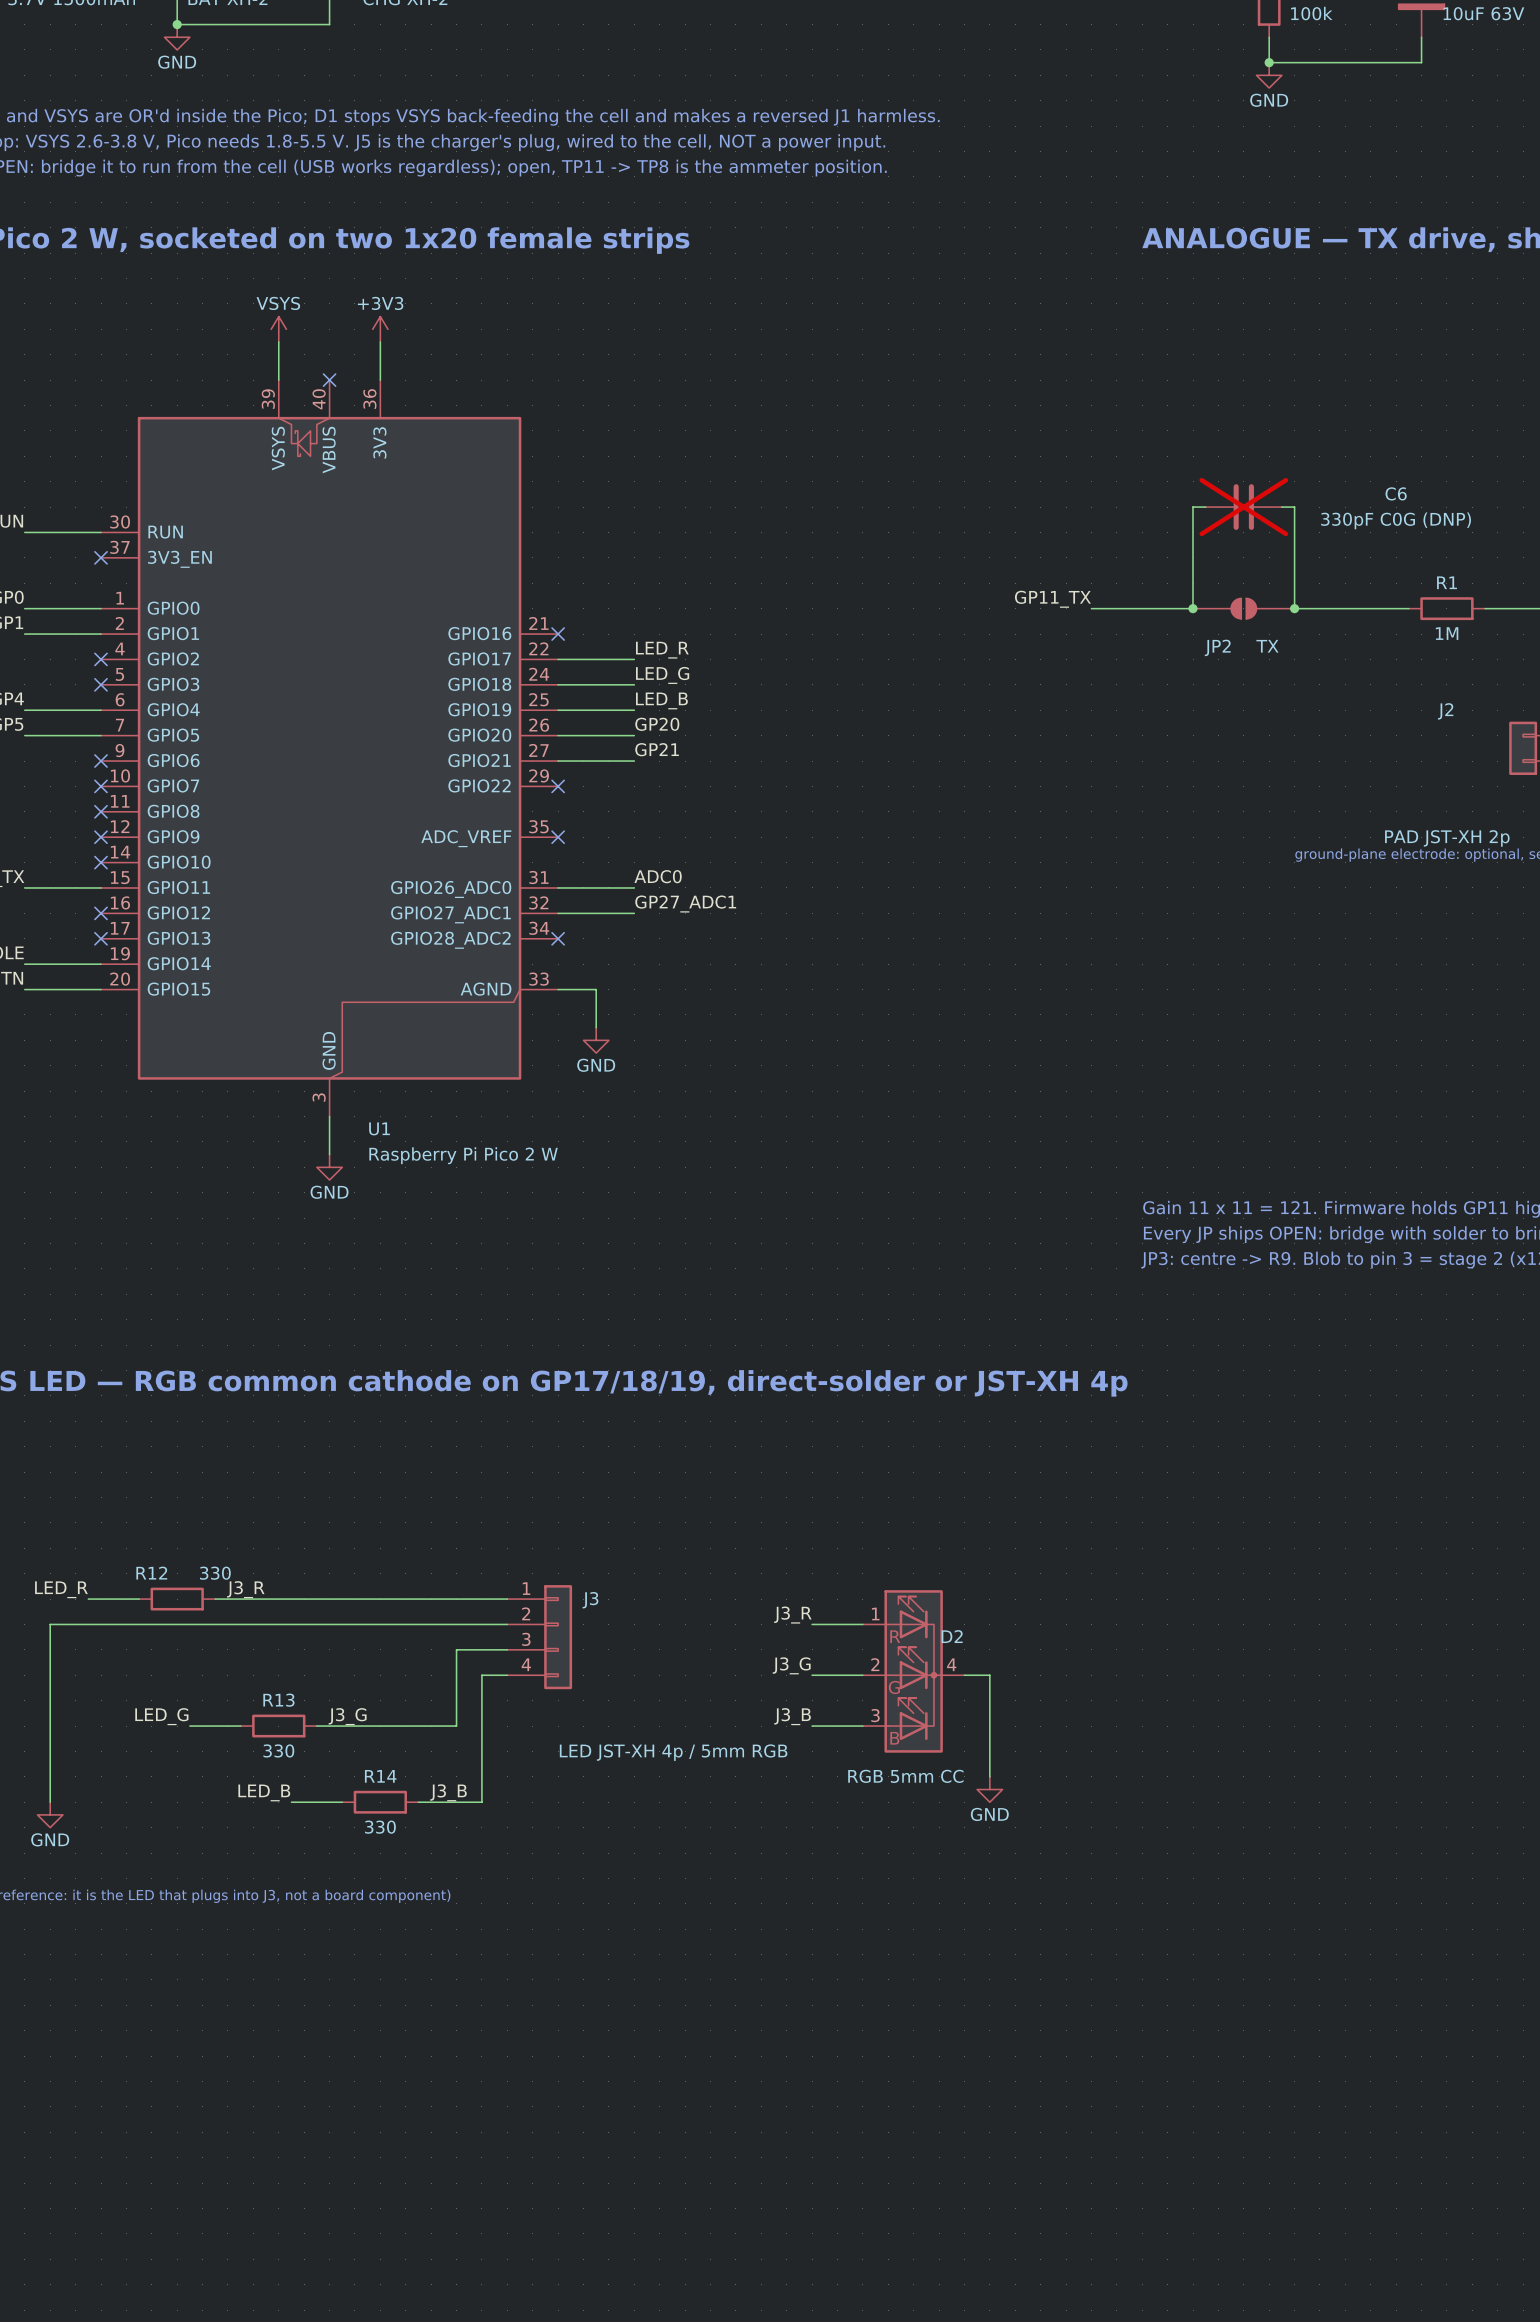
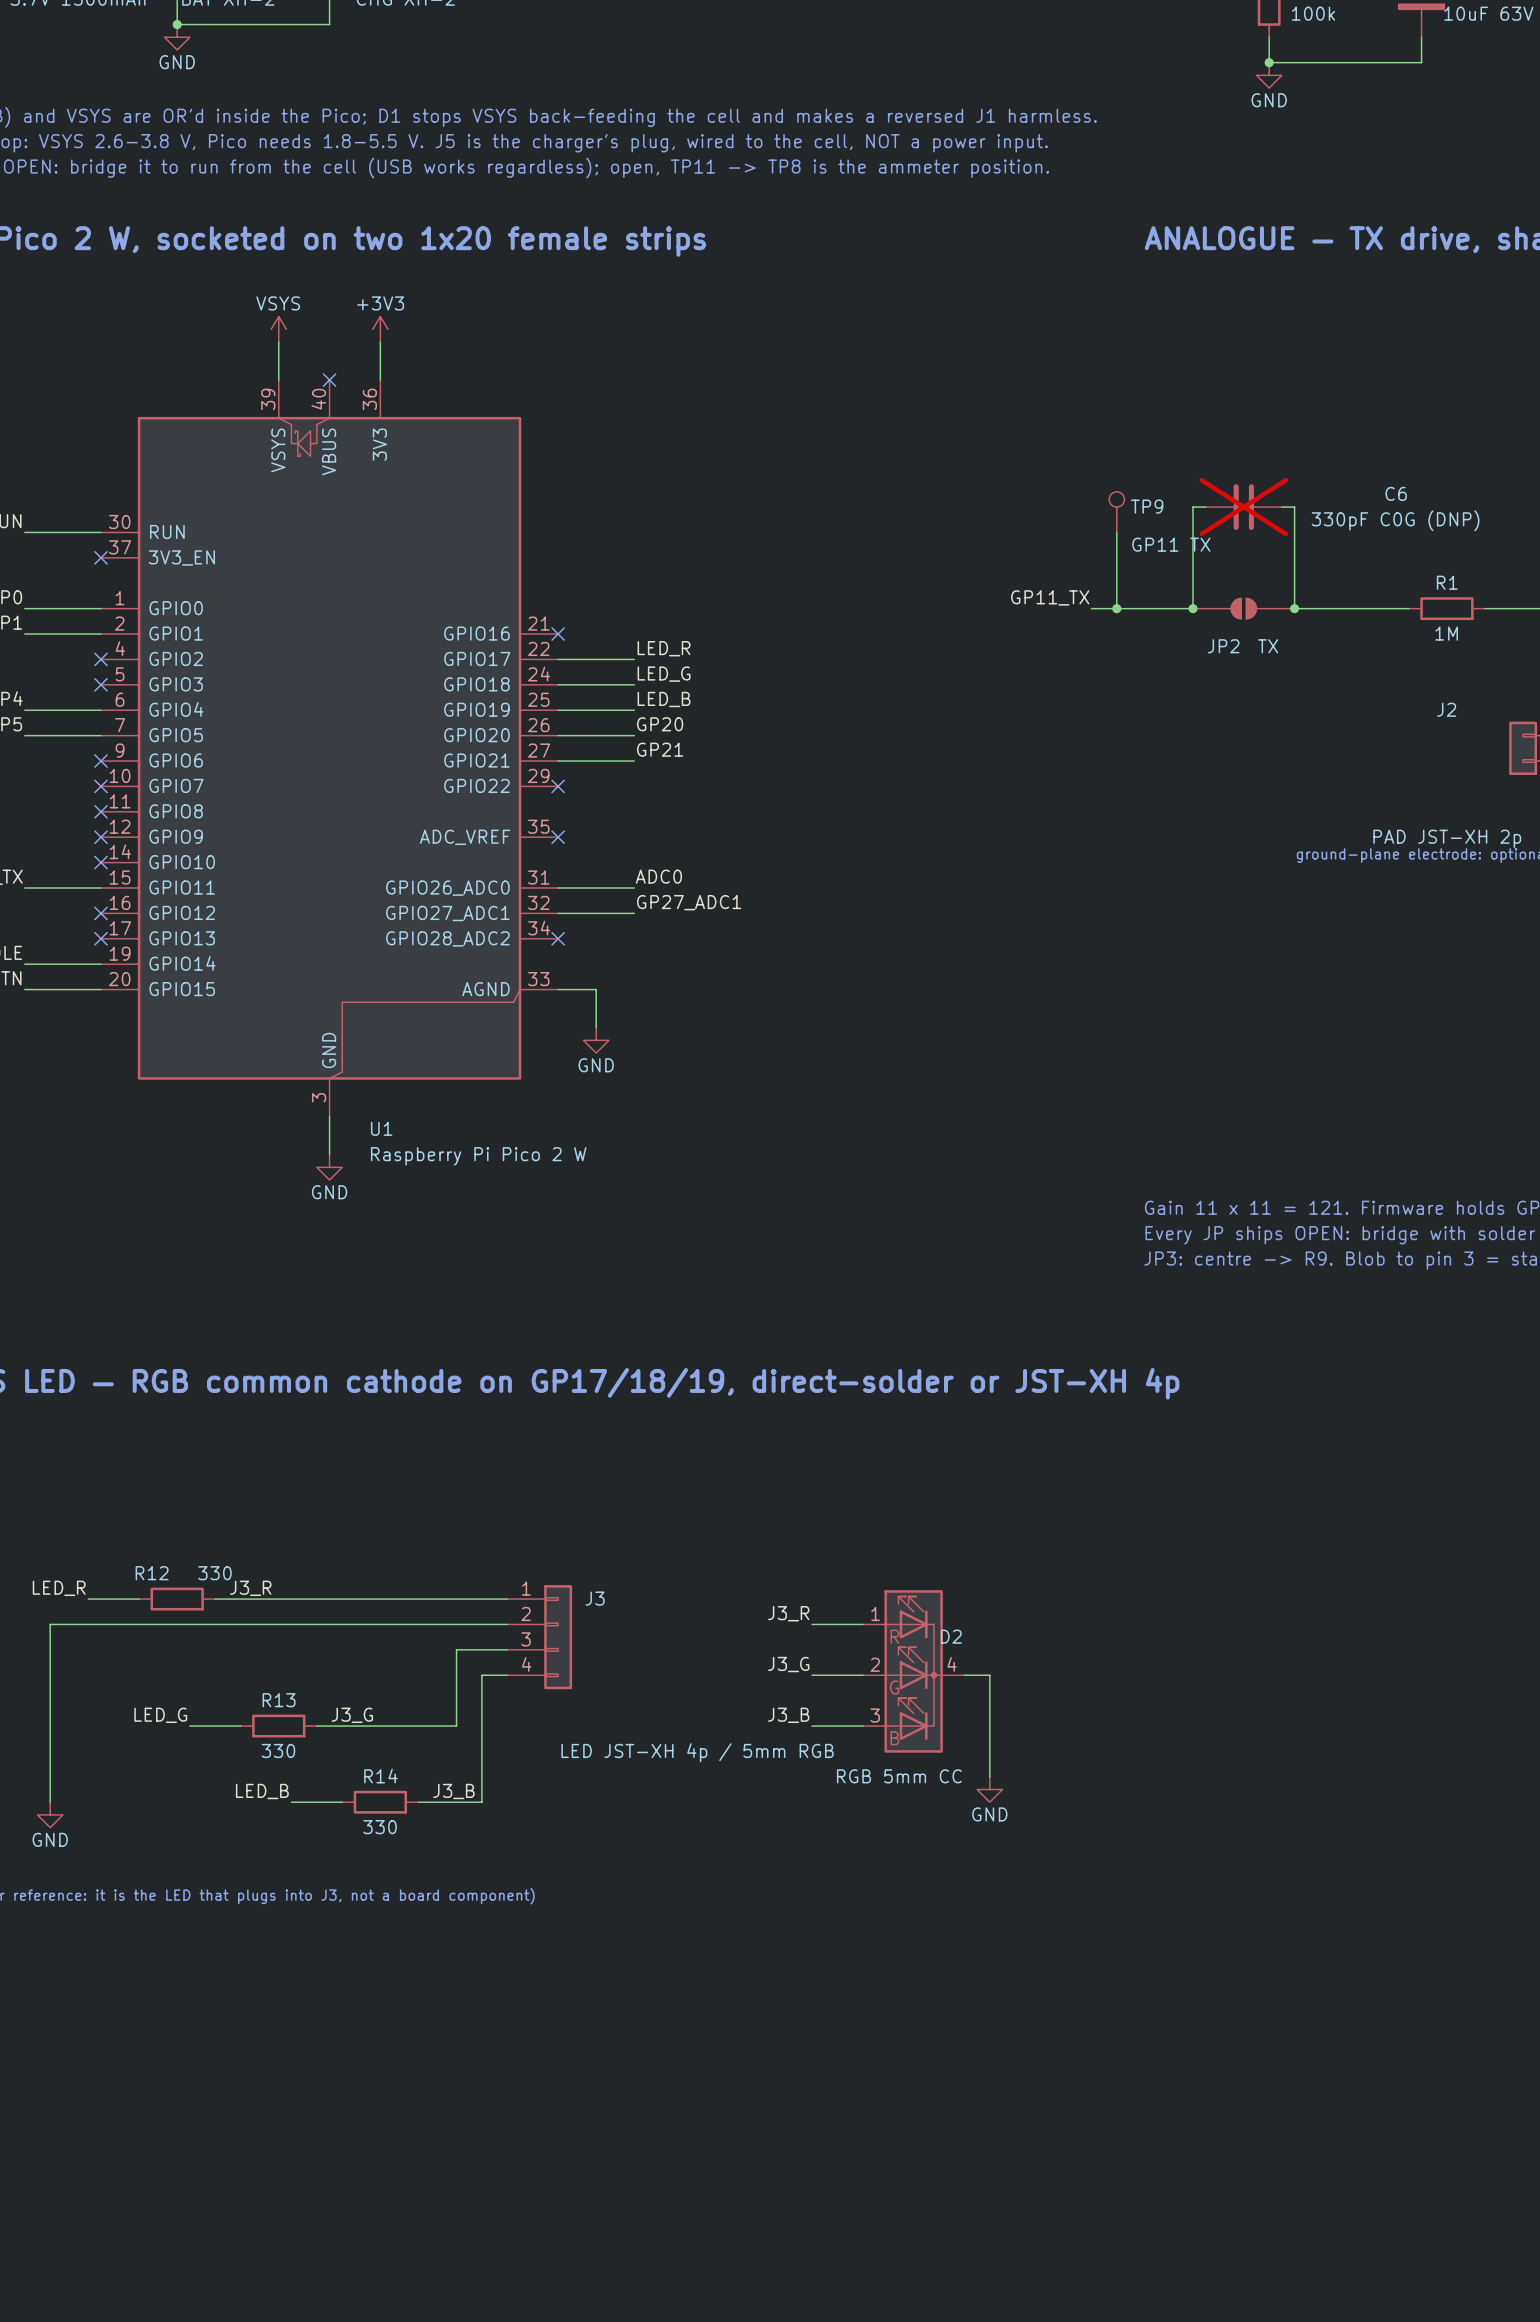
TP9: none -> GP11 TX (1116, 512)
wire: none -> (1116, 532) (1116, 608)
junction: none -> (1116, 608)

